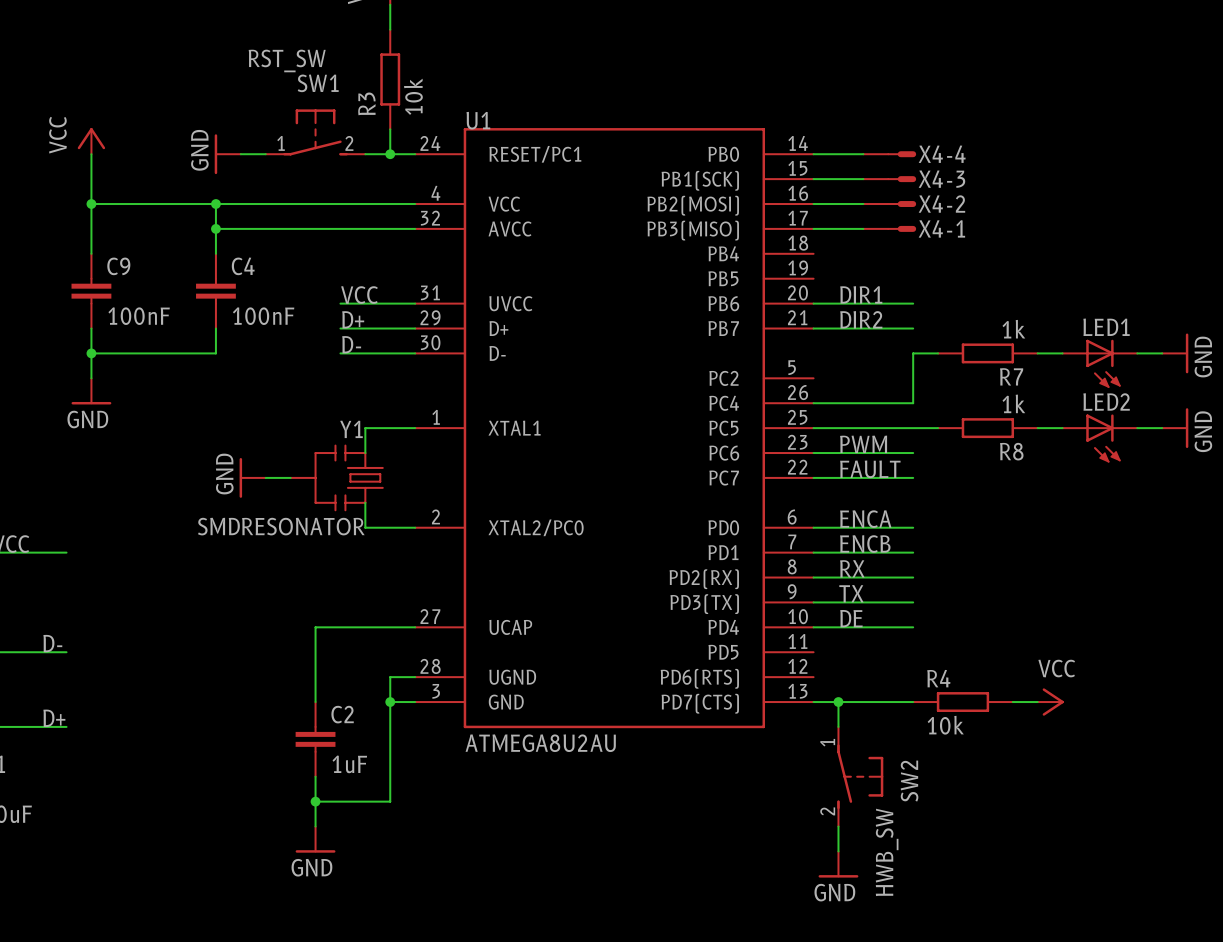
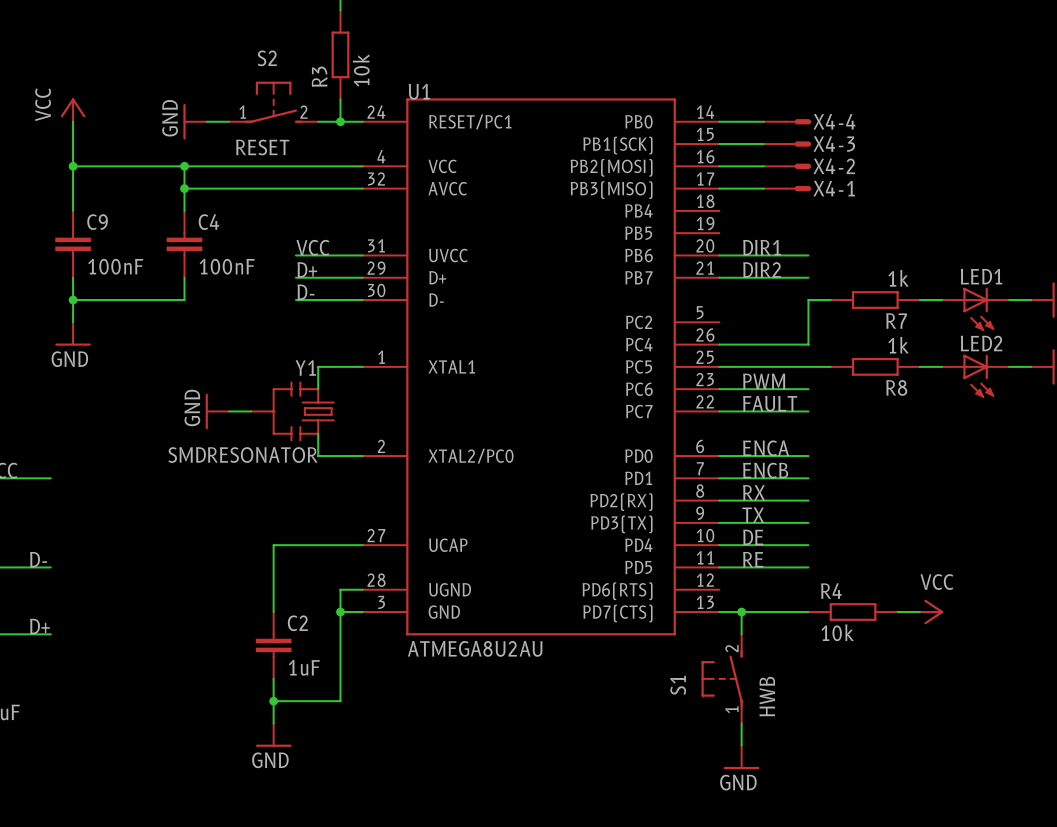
SW1 value: RST_SW (287, 60) -> RESET (262, 147)
SW1 name: SW1 (318, 83) -> S2 (267, 58)
label: none -> RE (753, 559)
wire: none -> (719, 567) (808, 567)
S1: none -> HWB (722, 678)
SW2: HWB_SW (860, 776) -> none

